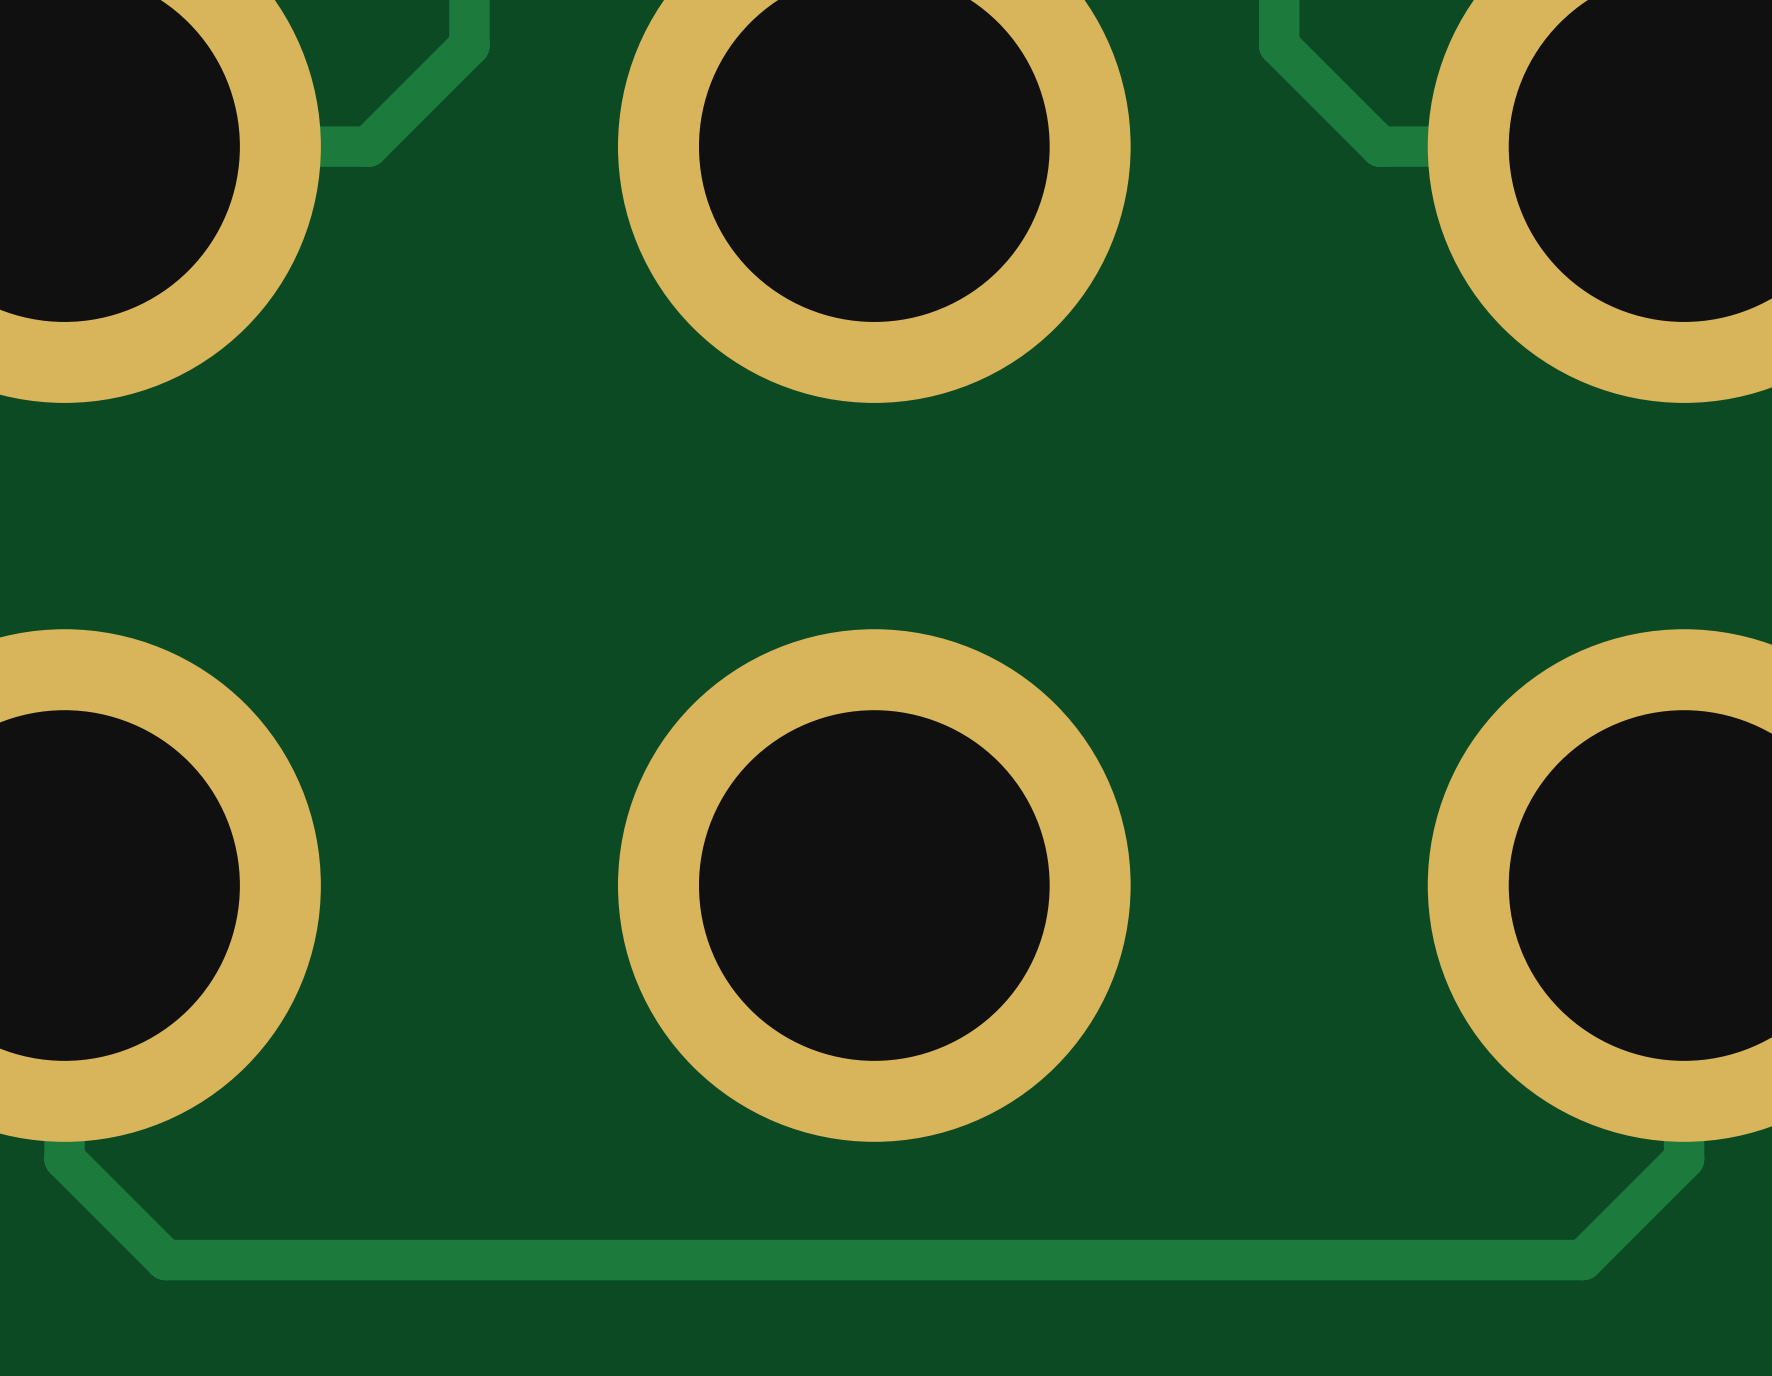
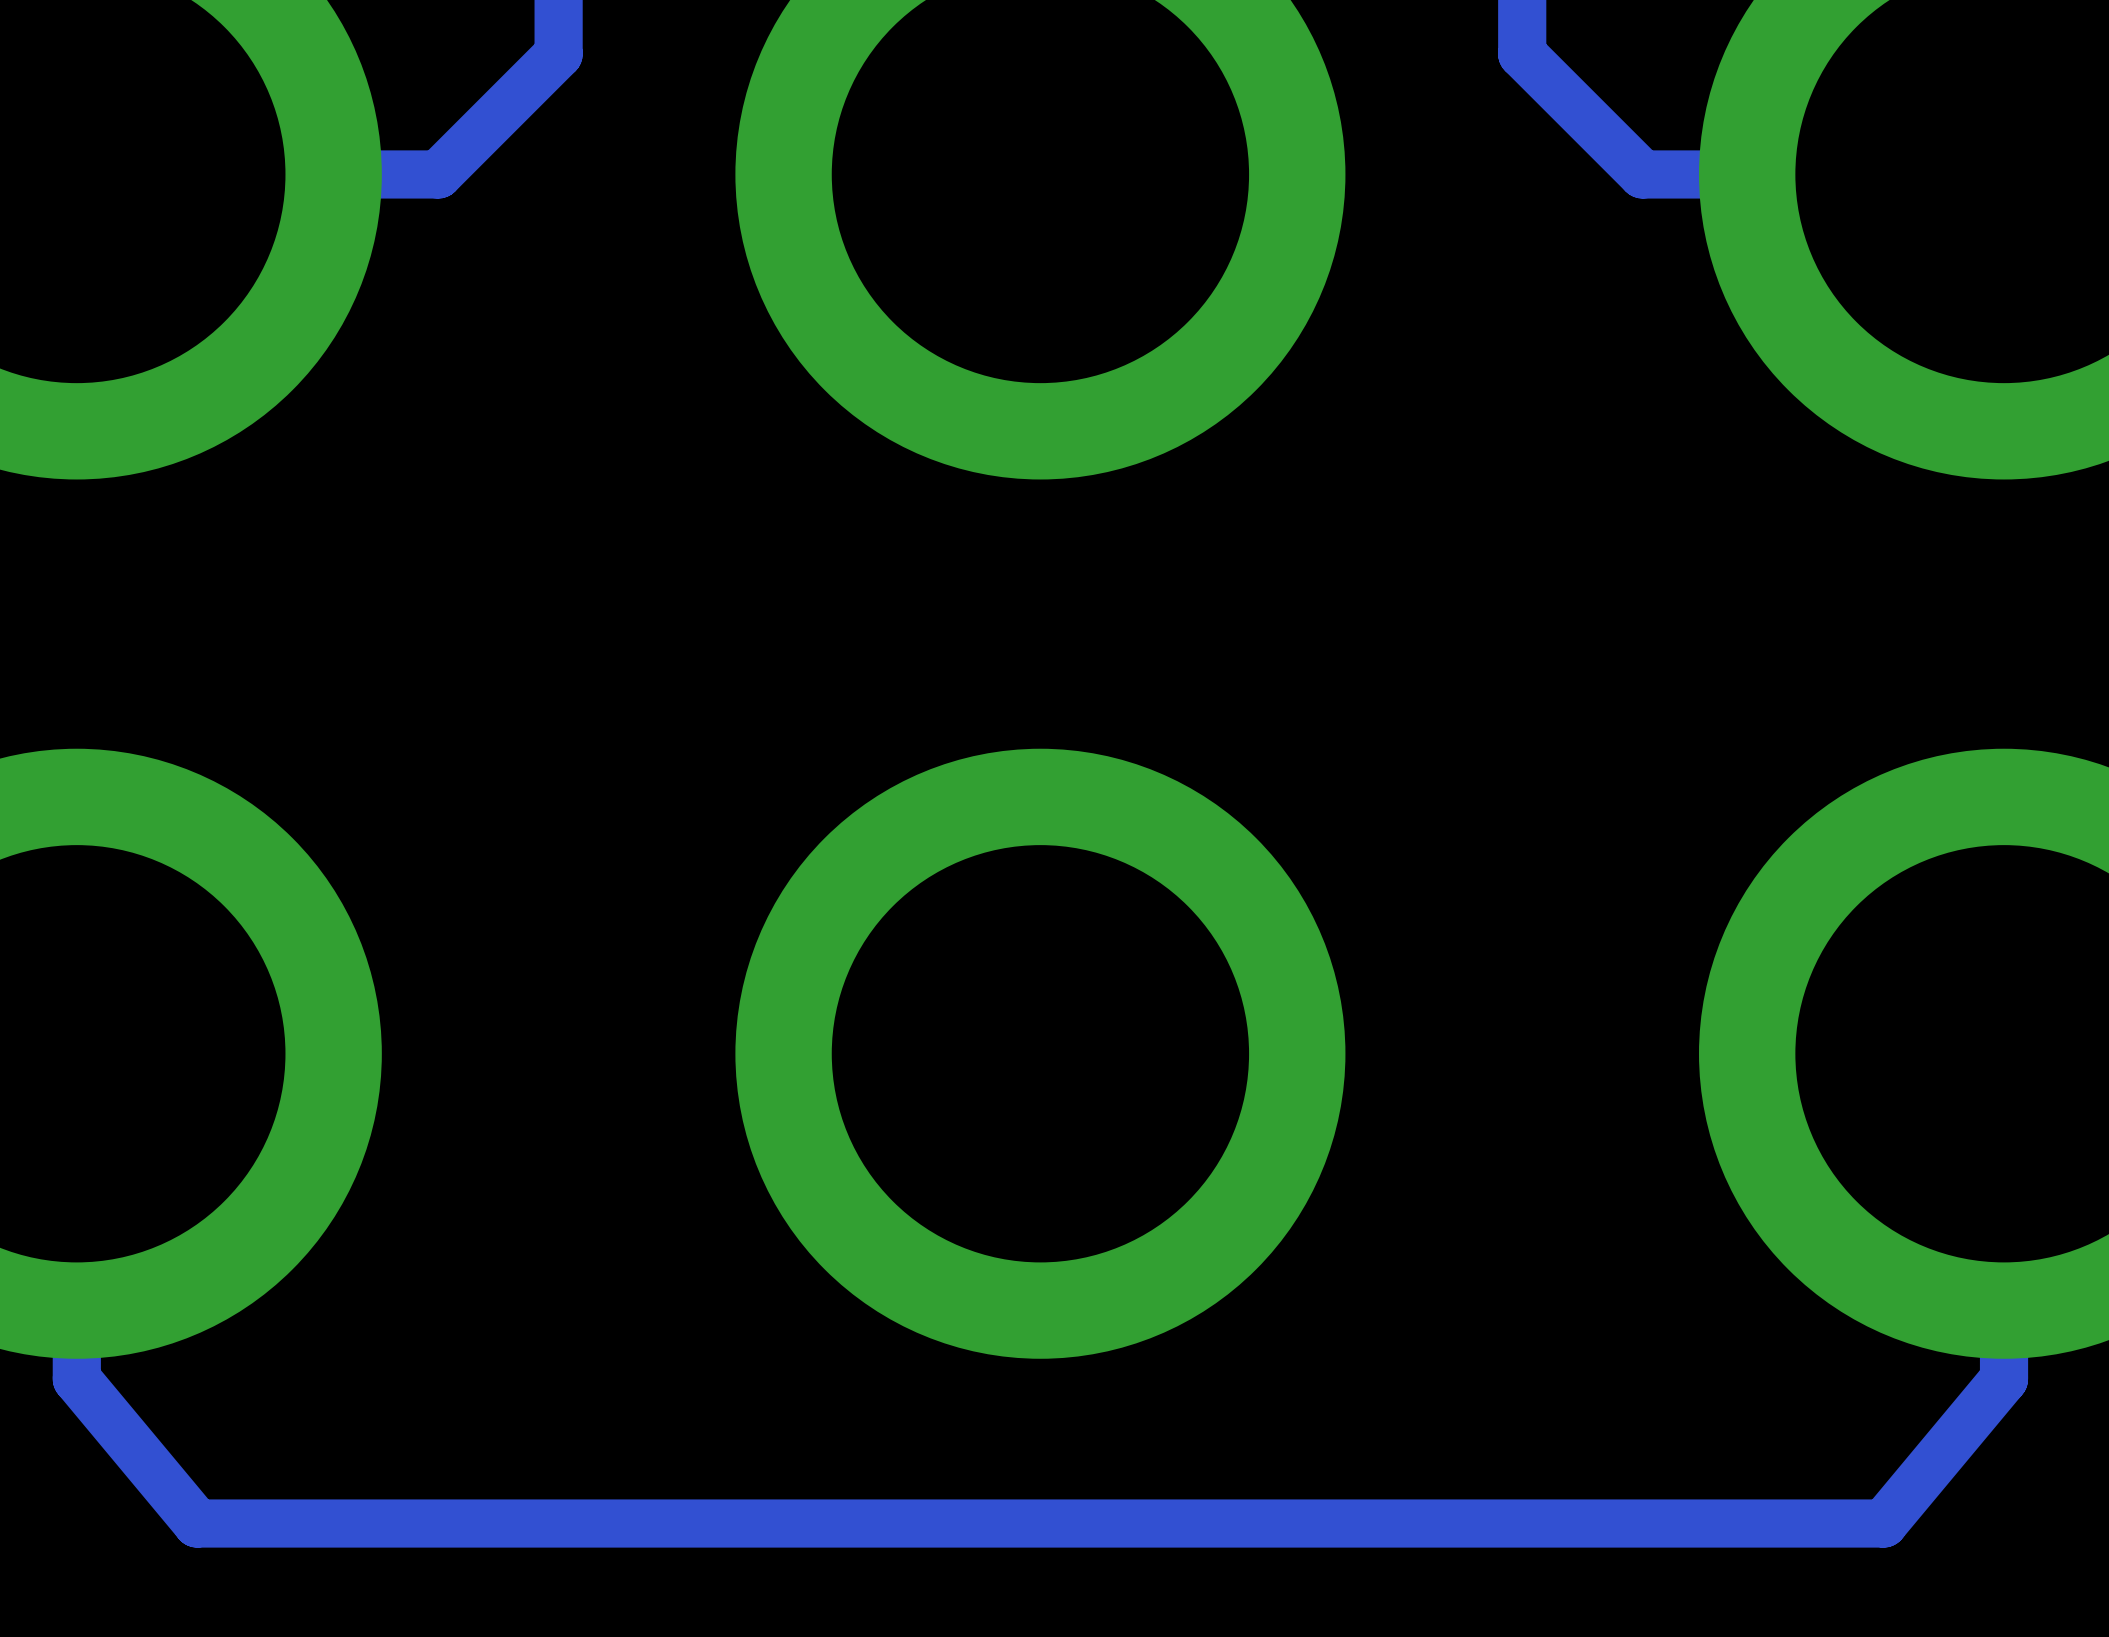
track: (1684, 1158) (1582, 1260) (165, 1260) (64, 1158) -> (2004, 1378) (1883, 1523) (197, 1523) (76, 1378)

